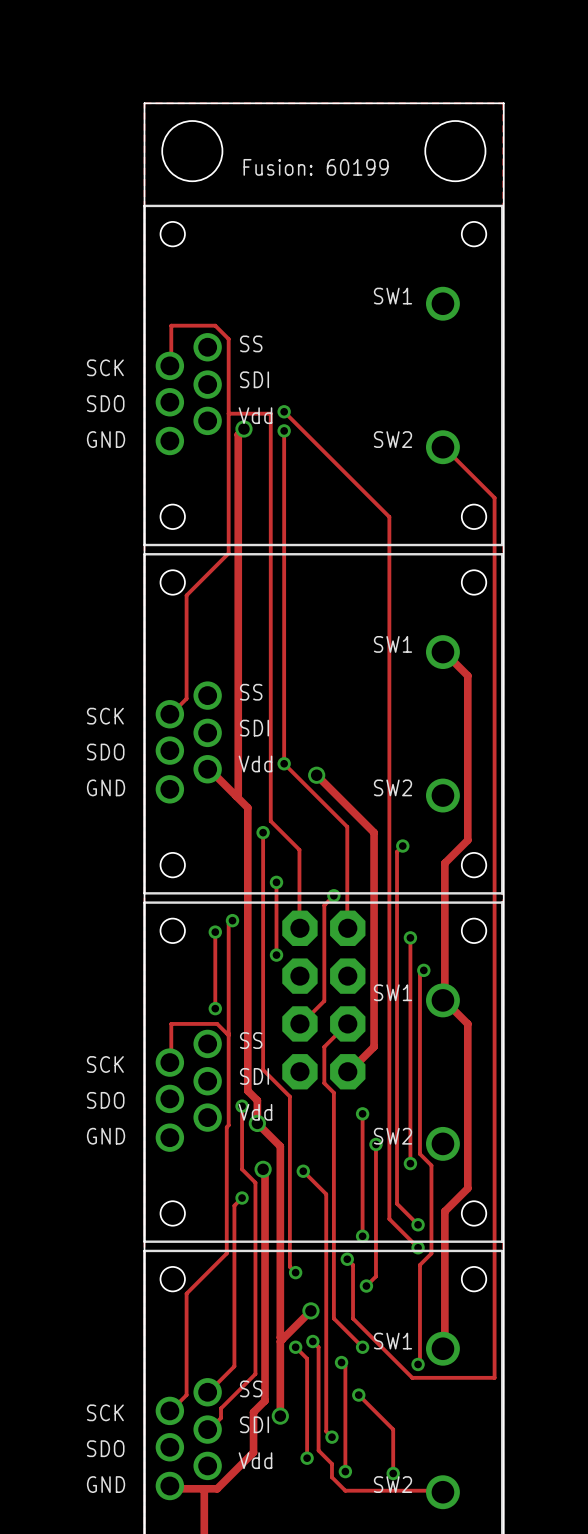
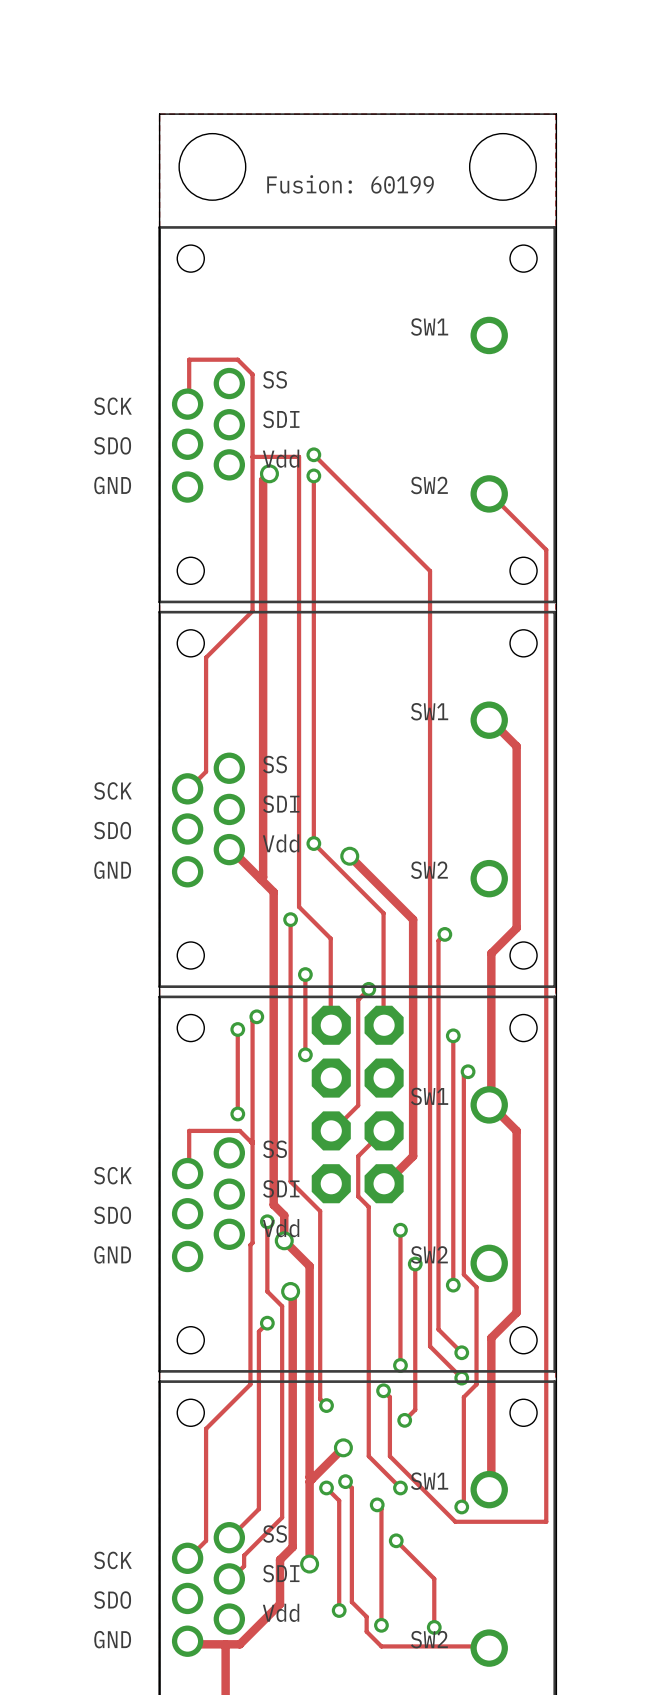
track: (303, 1171) (326, 1194) (326, 1431) (331, 1437) -> none
via: (303, 1171) -> none
via: (331, 1437) -> none

